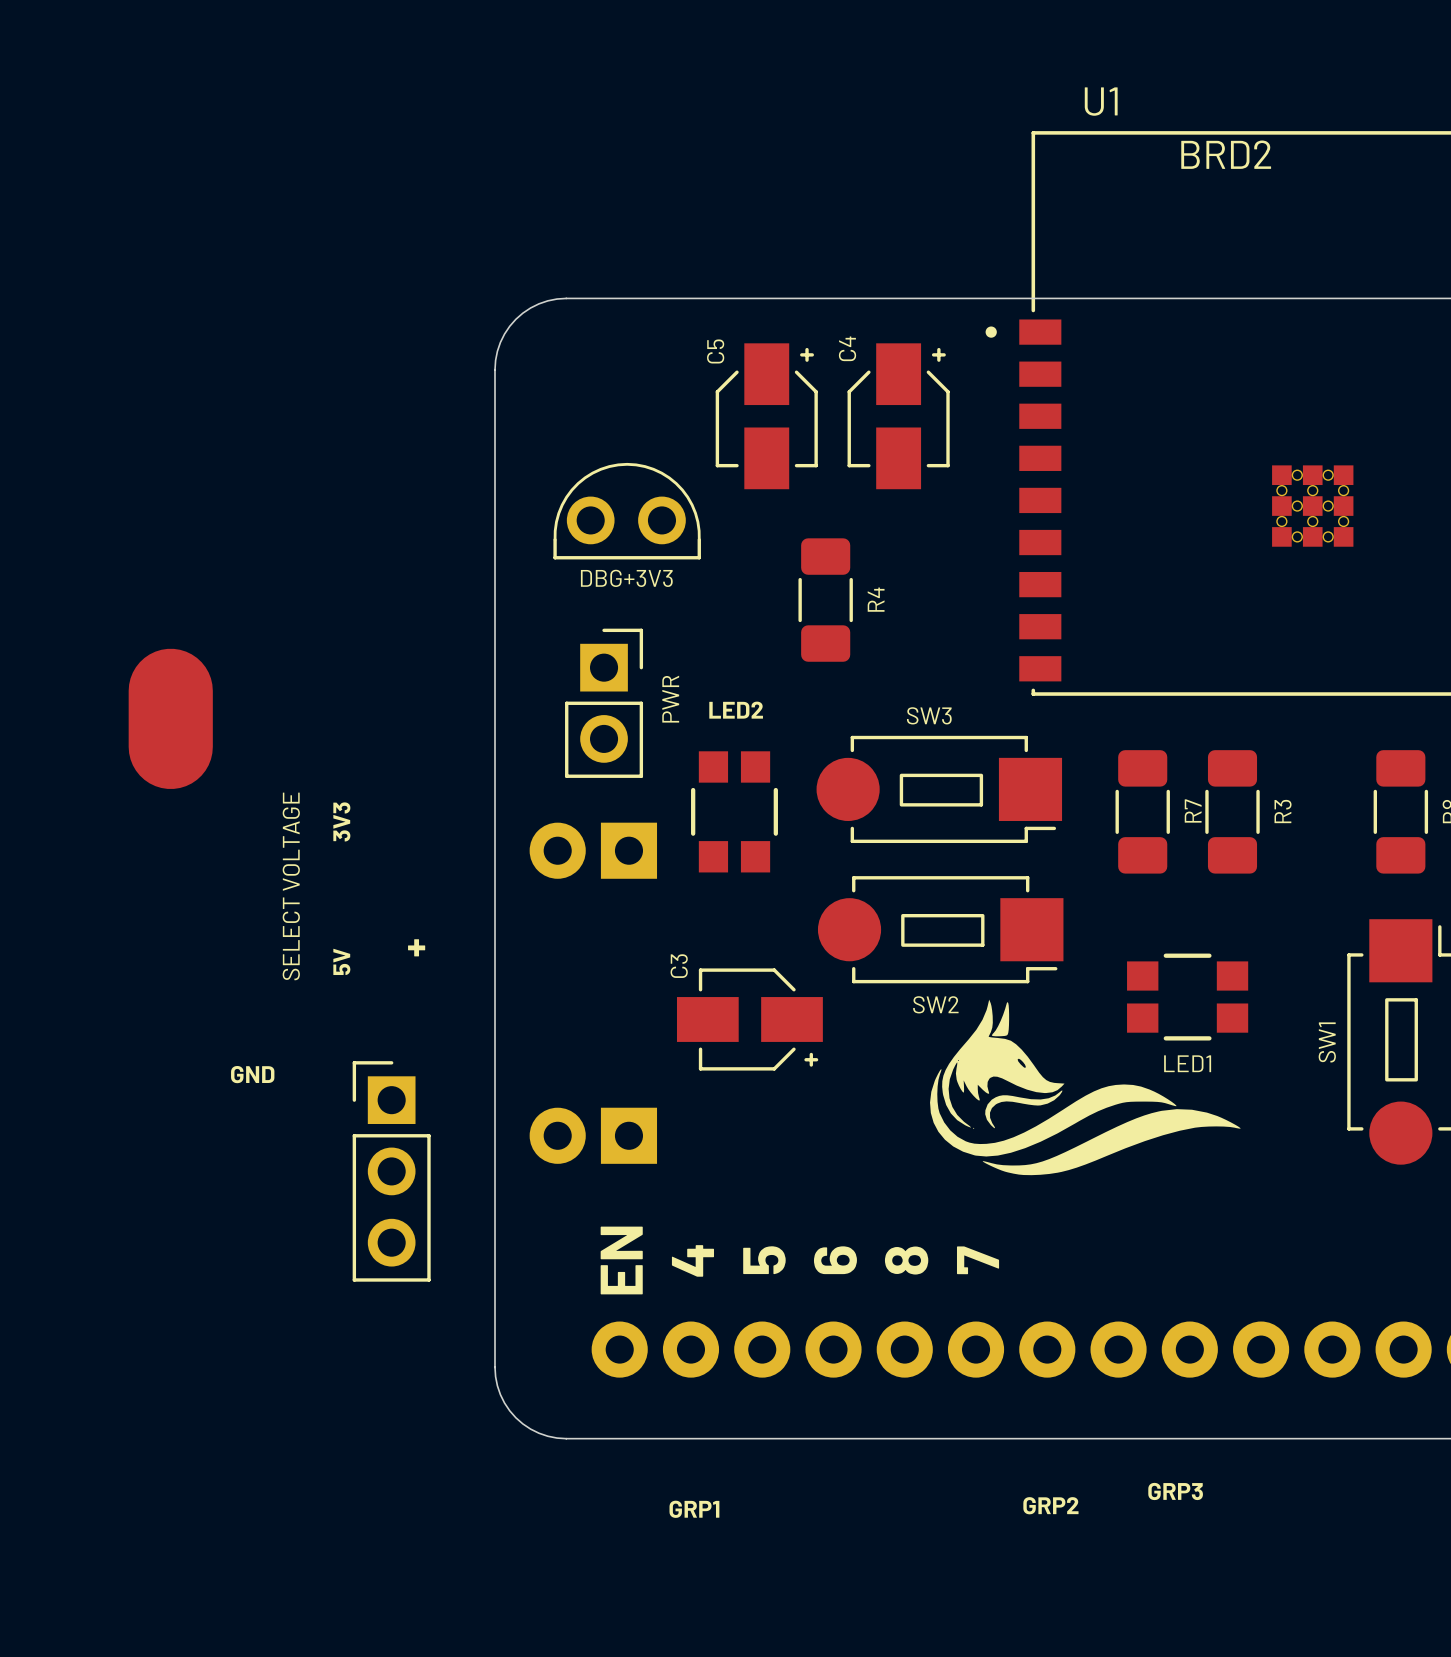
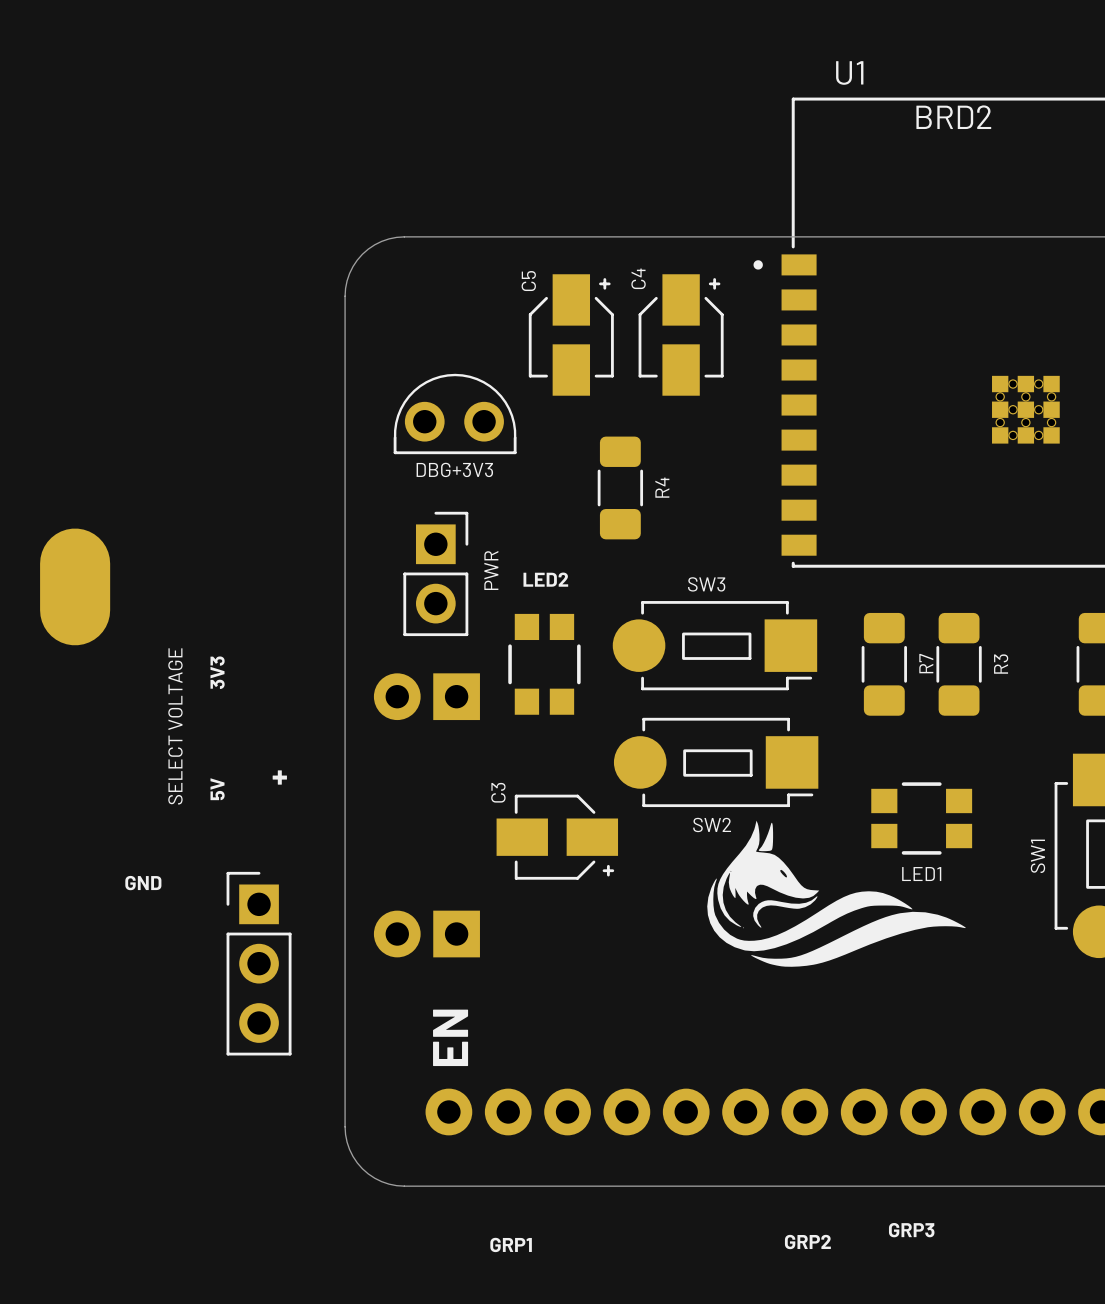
text: 4 (692, 1260) -> none
text: 5 (764, 1260) -> none
text: 6 (835, 1260) -> none
text: 8 (906, 1260) -> none
text: 7 (978, 1260) -> none

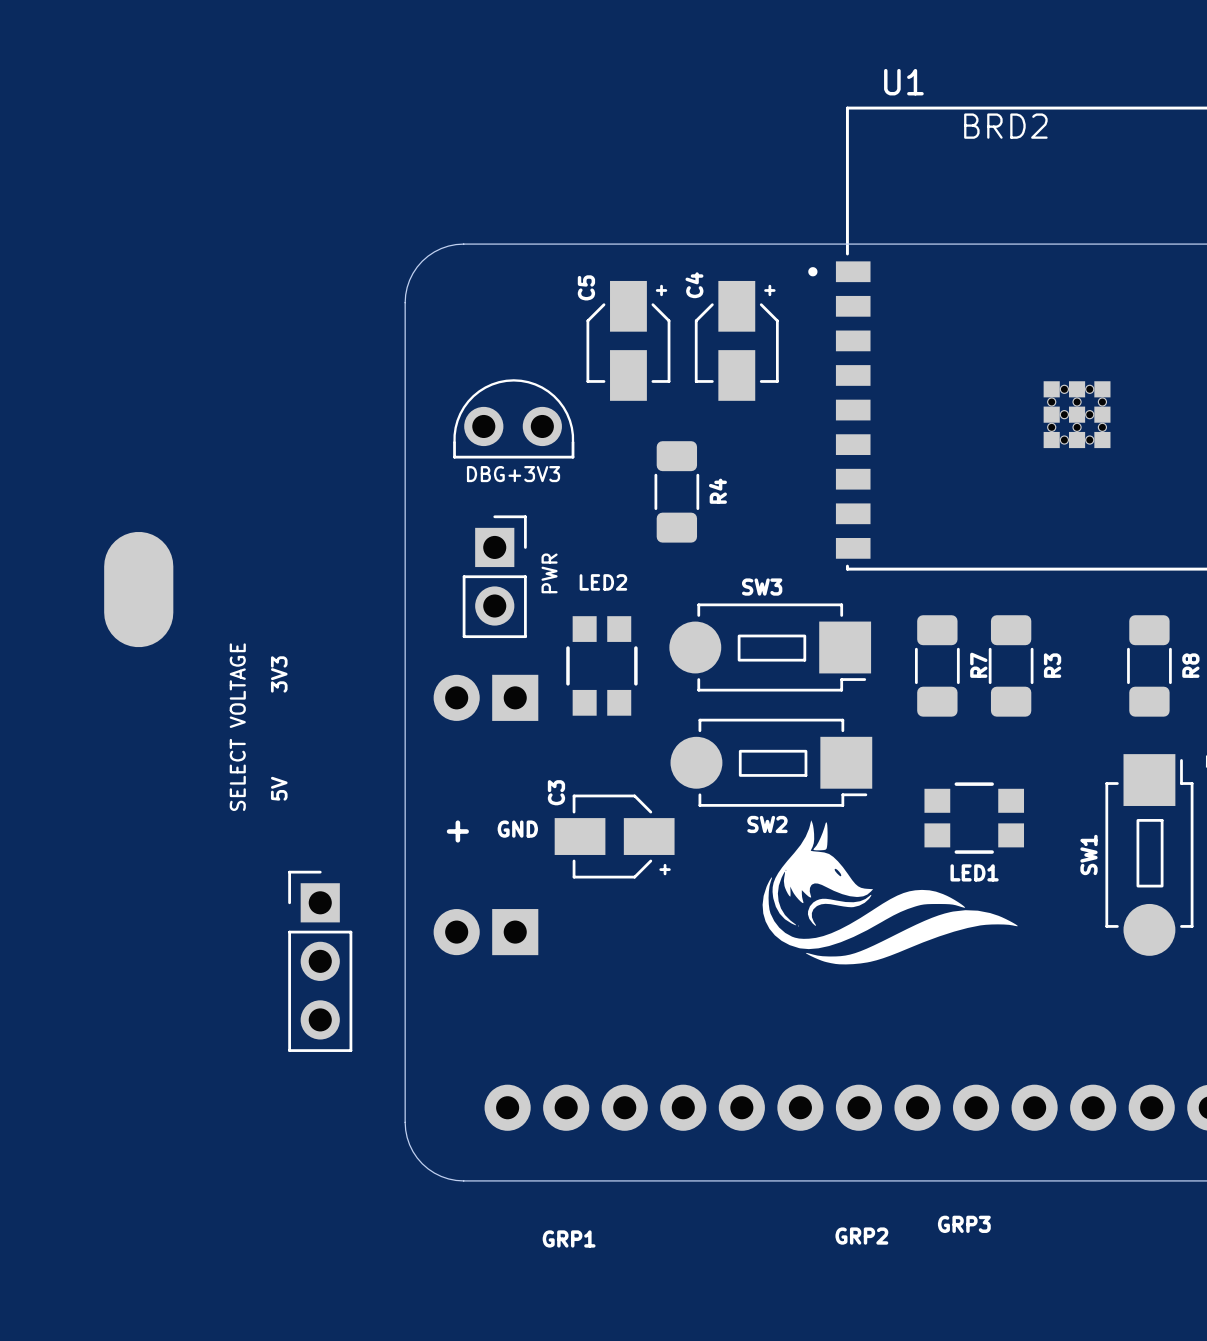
text position: + (279, 777) -> + (457, 831)
text position: GND (143, 883) -> GND (517, 829)
text: EN (450, 1037) -> none

